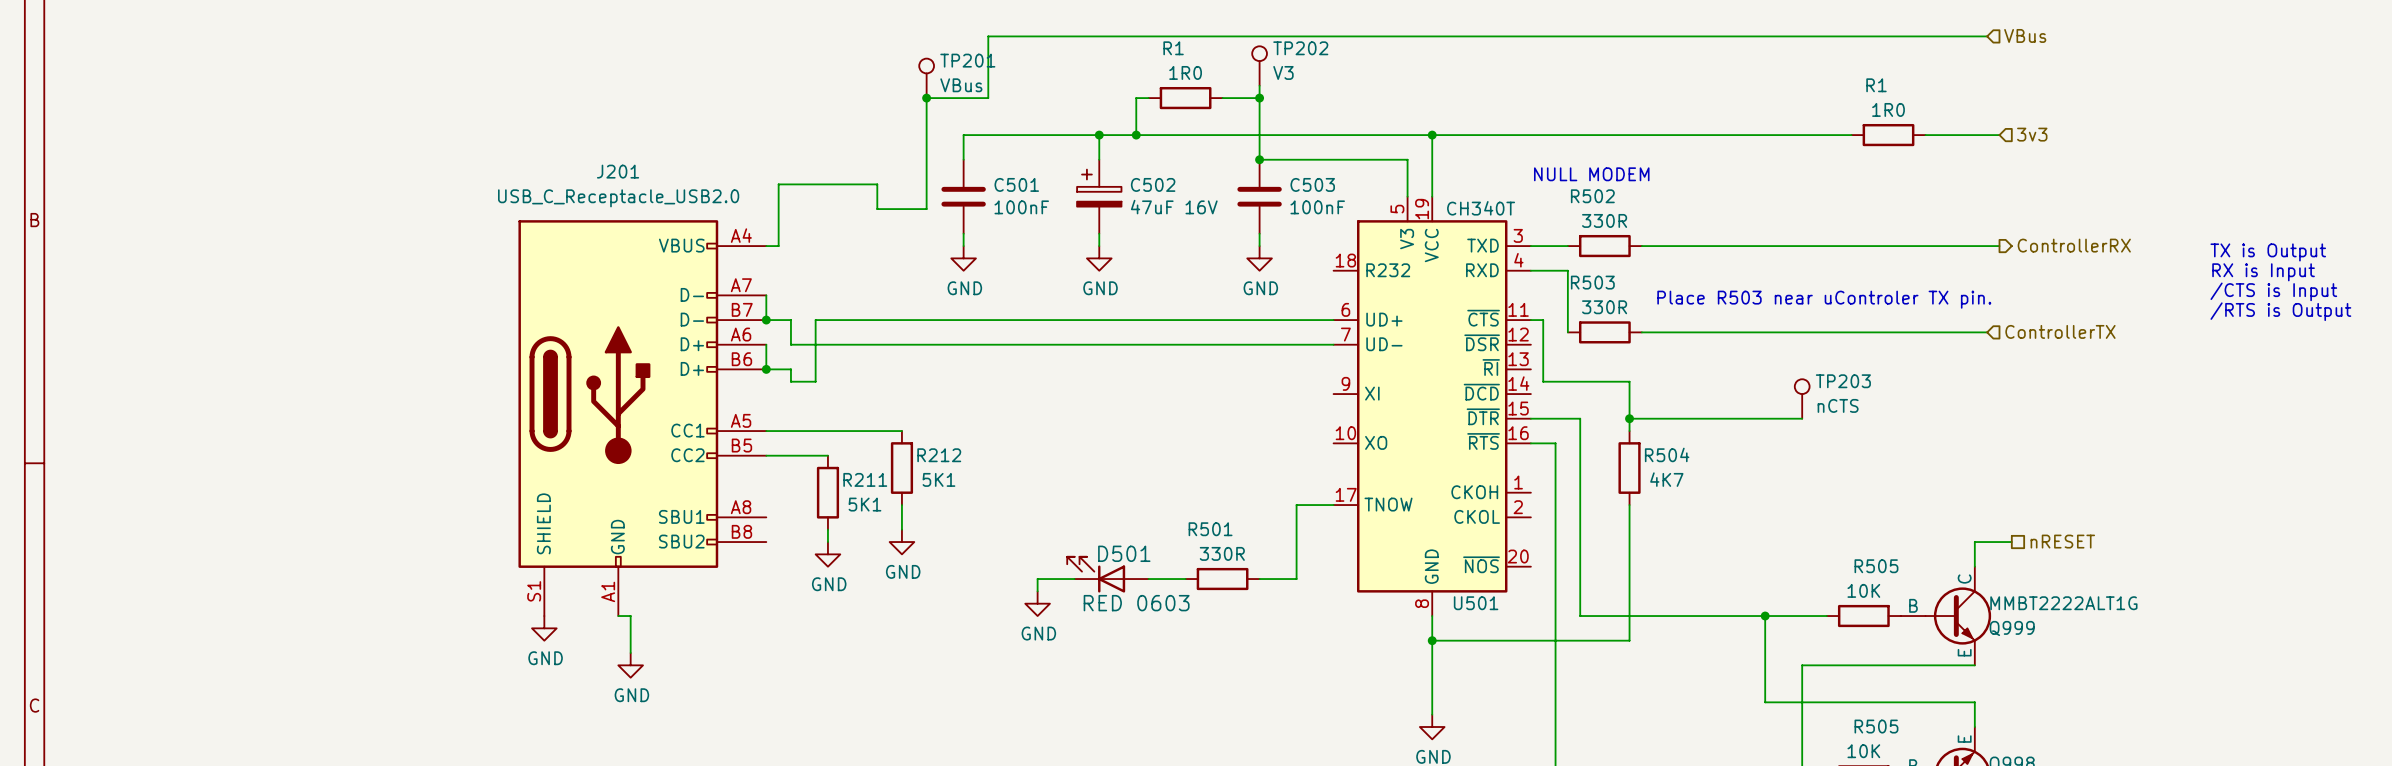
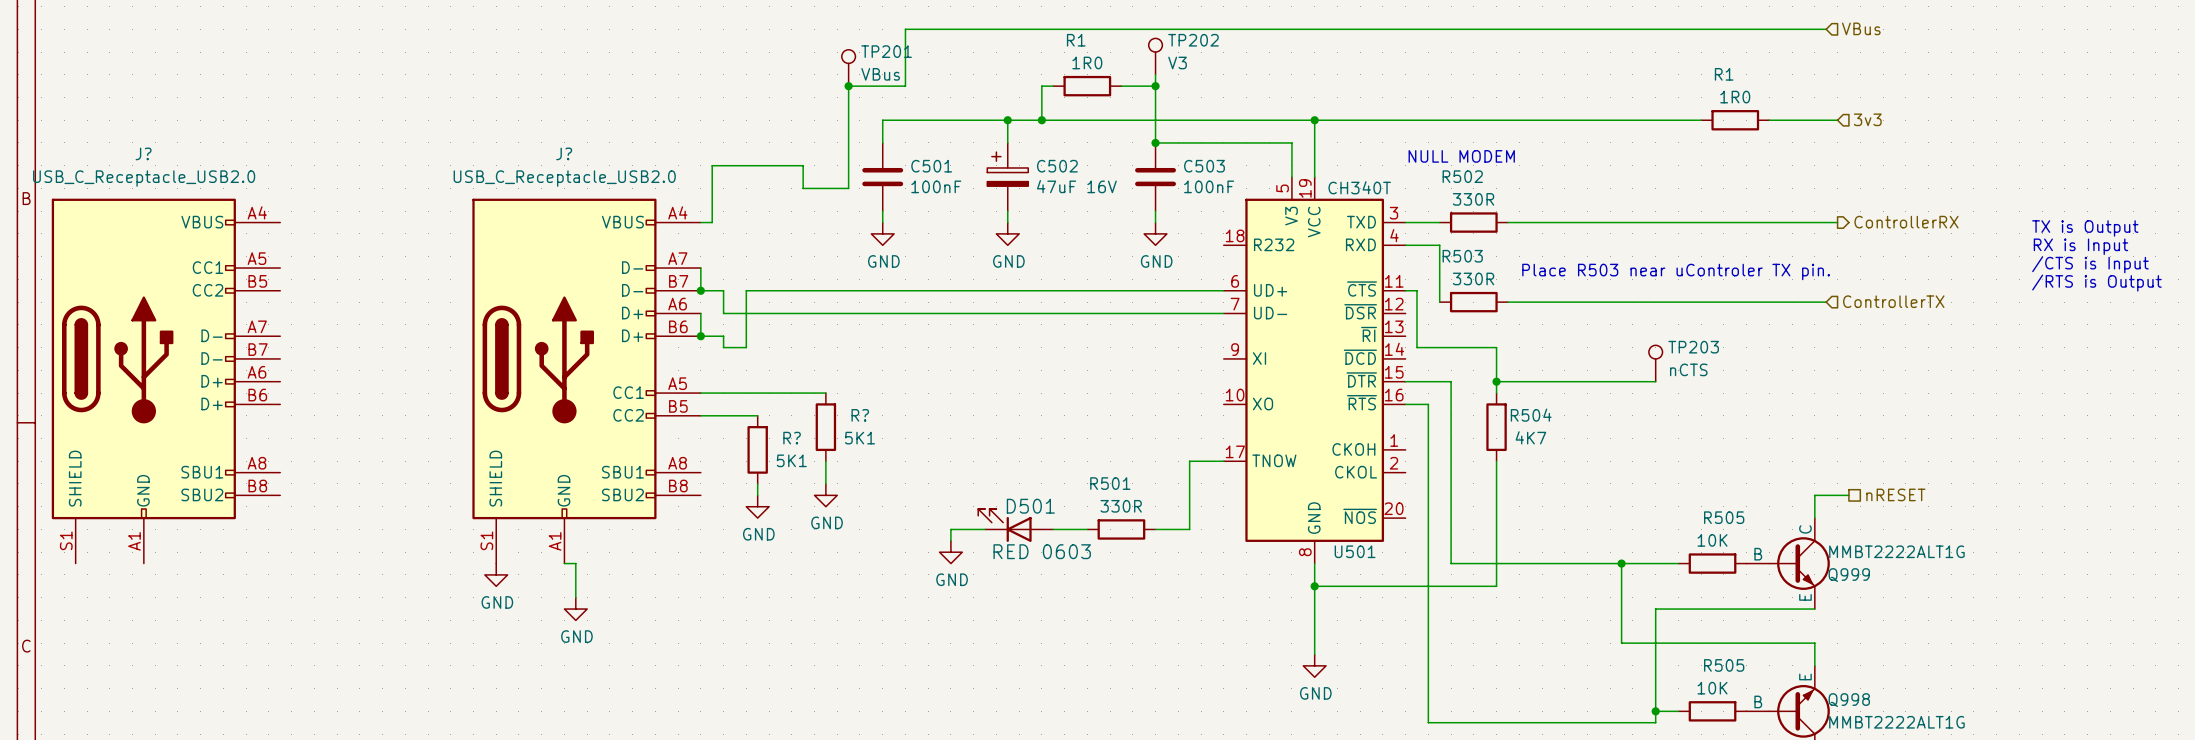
J201 name: J201 (618, 171) -> J? (564, 153)
J?: none -> USB_C_Receptacle_USB2.0 (166, 381)
R212 name: R212 (939, 455) -> R? (860, 415)
R211 name: R211 (865, 479) -> R? (792, 438)

